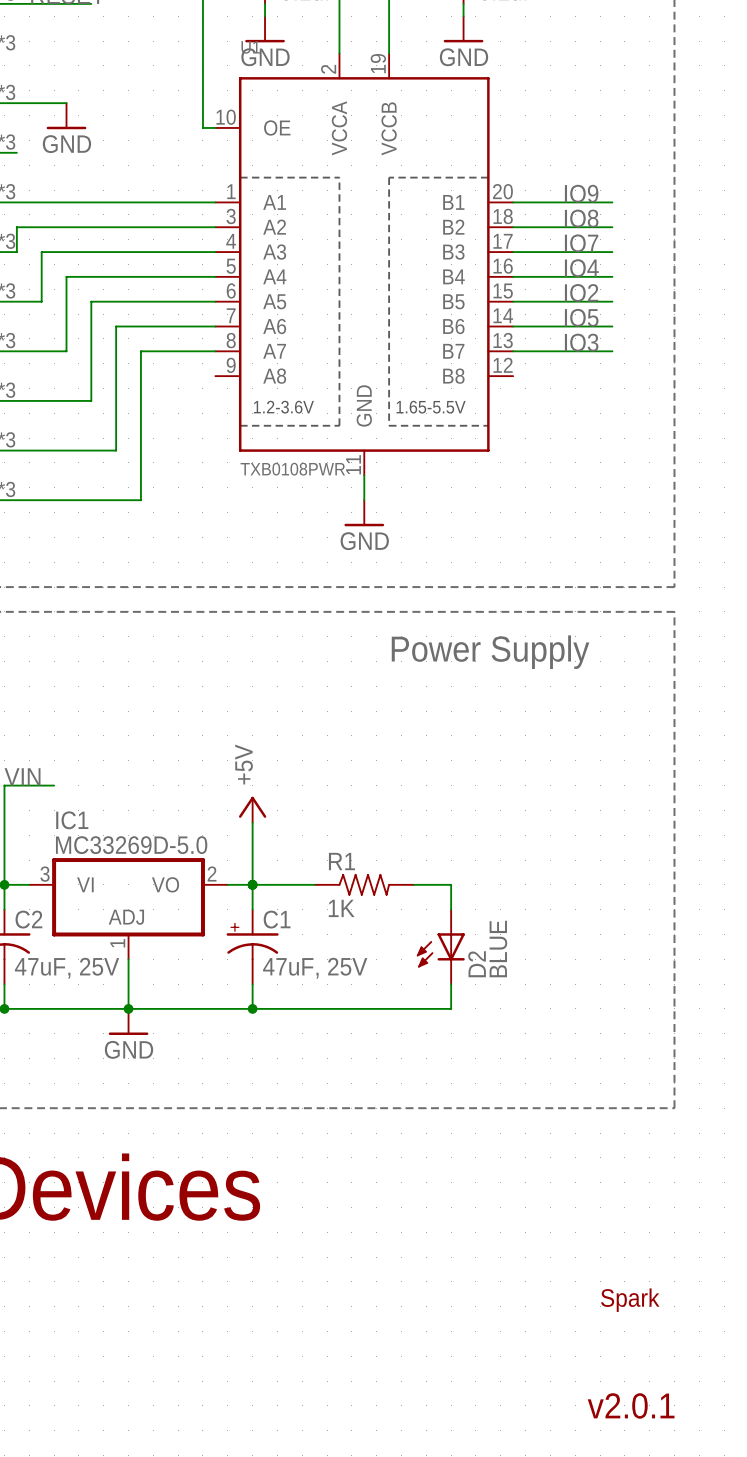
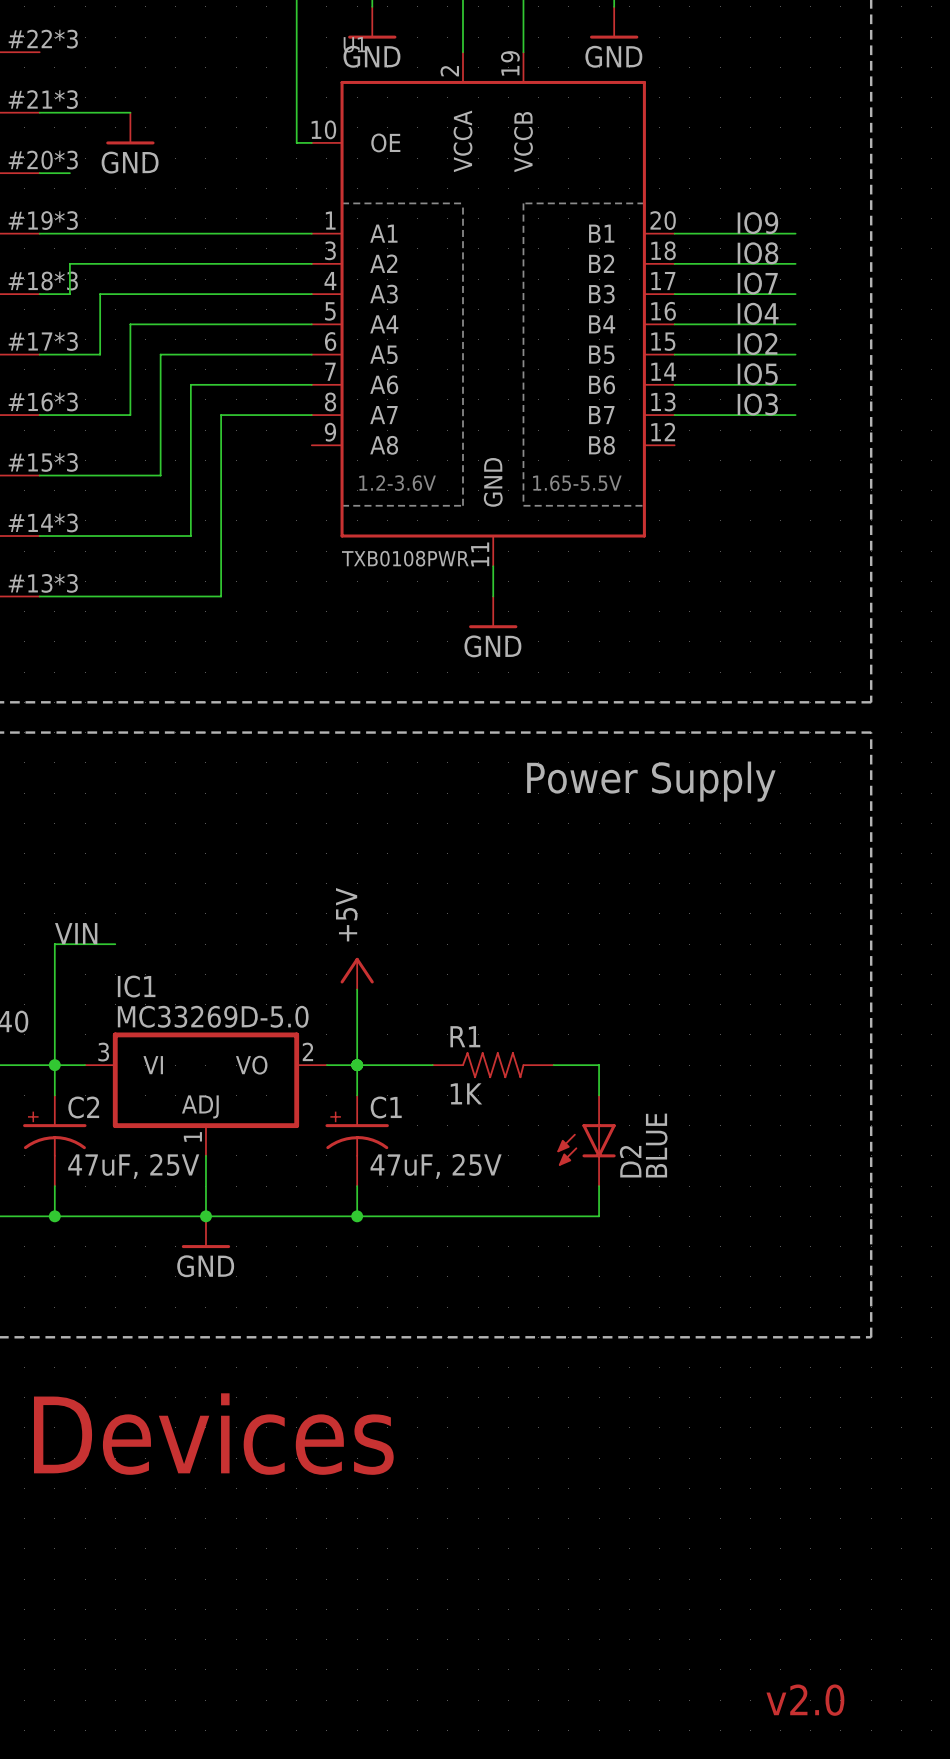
part: (630, 1300) -> none
text: v2.0.1 (631, 1405) -> v2.0 (805, 1700)

